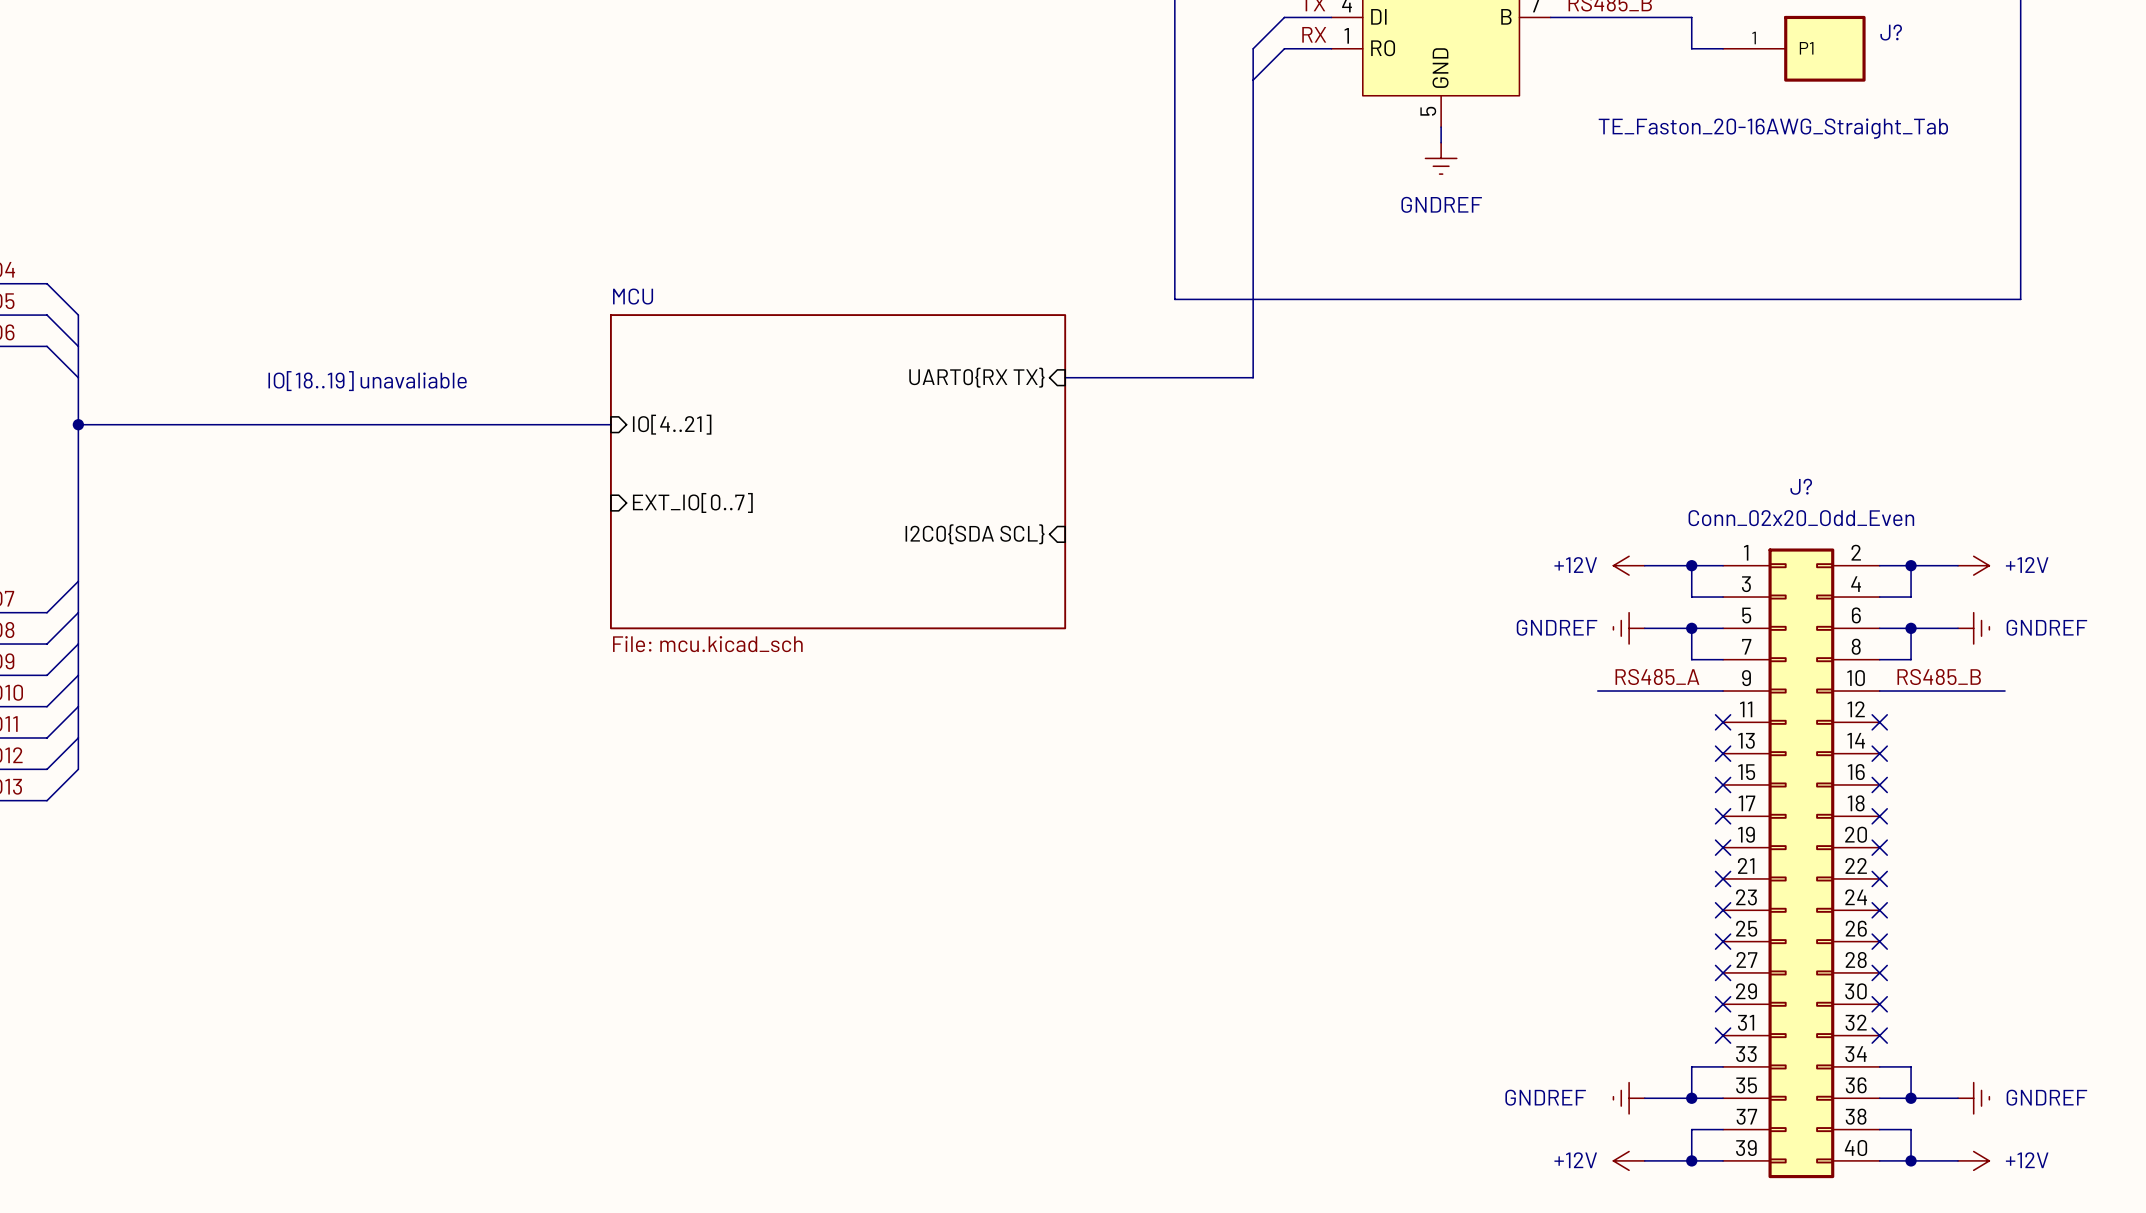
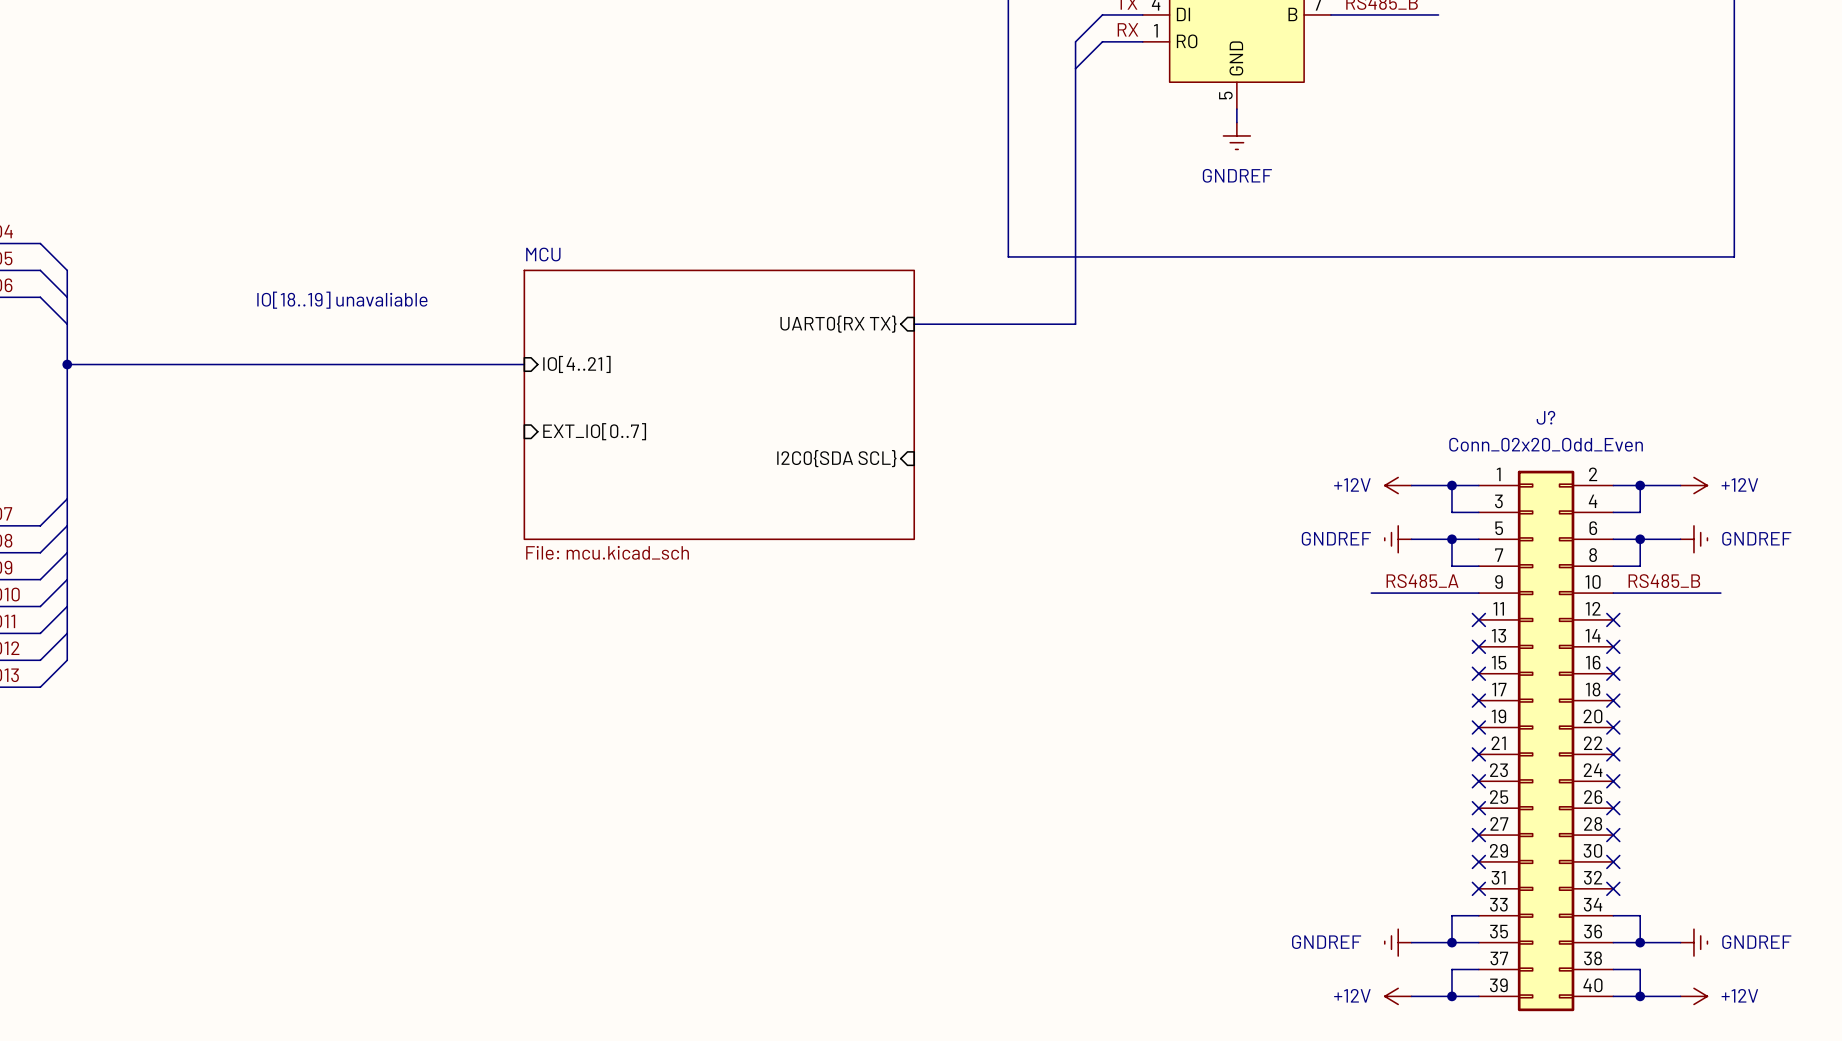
wire: (1676, 17) (1691, 17) (1691, 48) (1723, 48) -> none
J?: TE_Faston_20-16AWG_Straight_Tab (1794, 48) -> none
text position: IO[18..19] unavaliable (367, 381) -> IO[18..19] unavaliable (342, 300)

